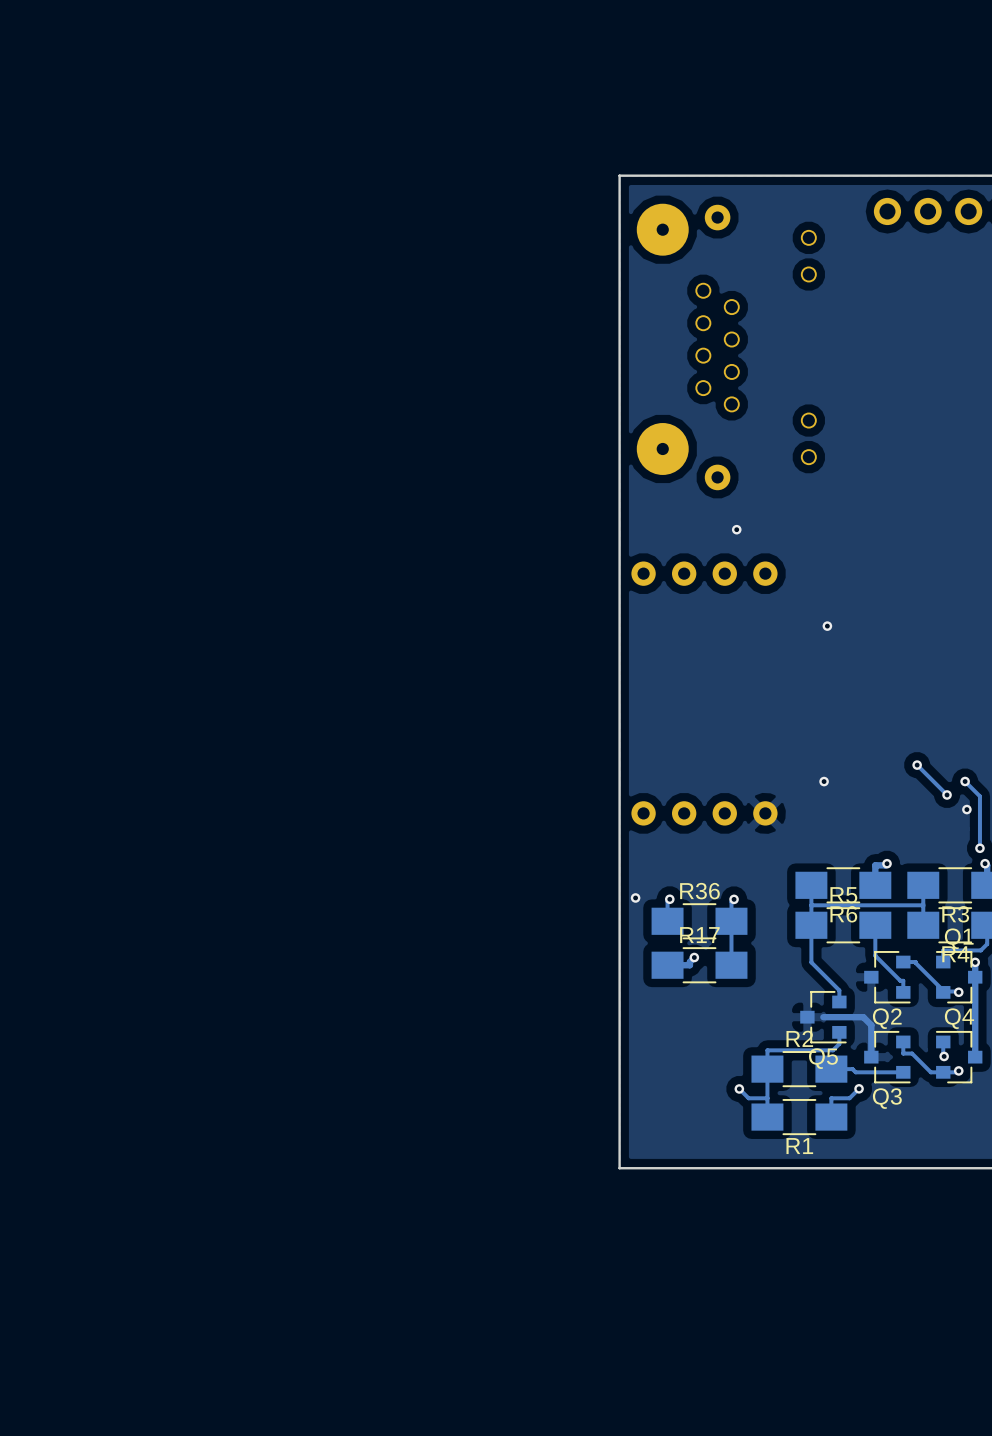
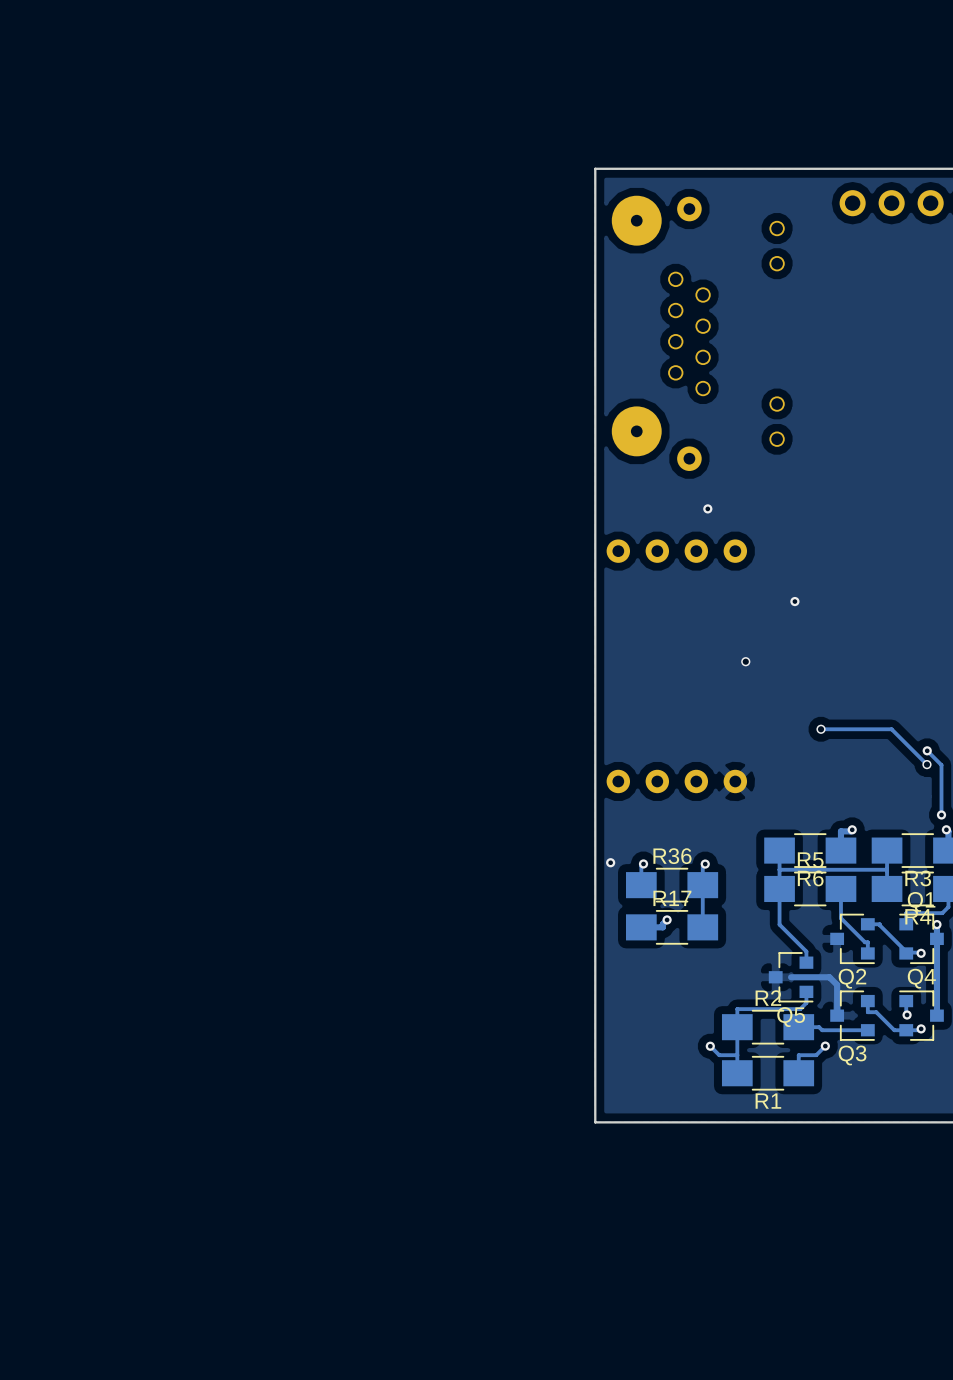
via: none -> (745, 661)
track: none -> (821, 729) (891, 729) (926, 764)
via: none -> (821, 729)
track: (917, 765) (947, 794) -> none
via: (917, 765) -> none
via: (824, 781) -> none
via: (947, 794) -> none
via: none -> (926, 764)
via: (966, 809) -> none

